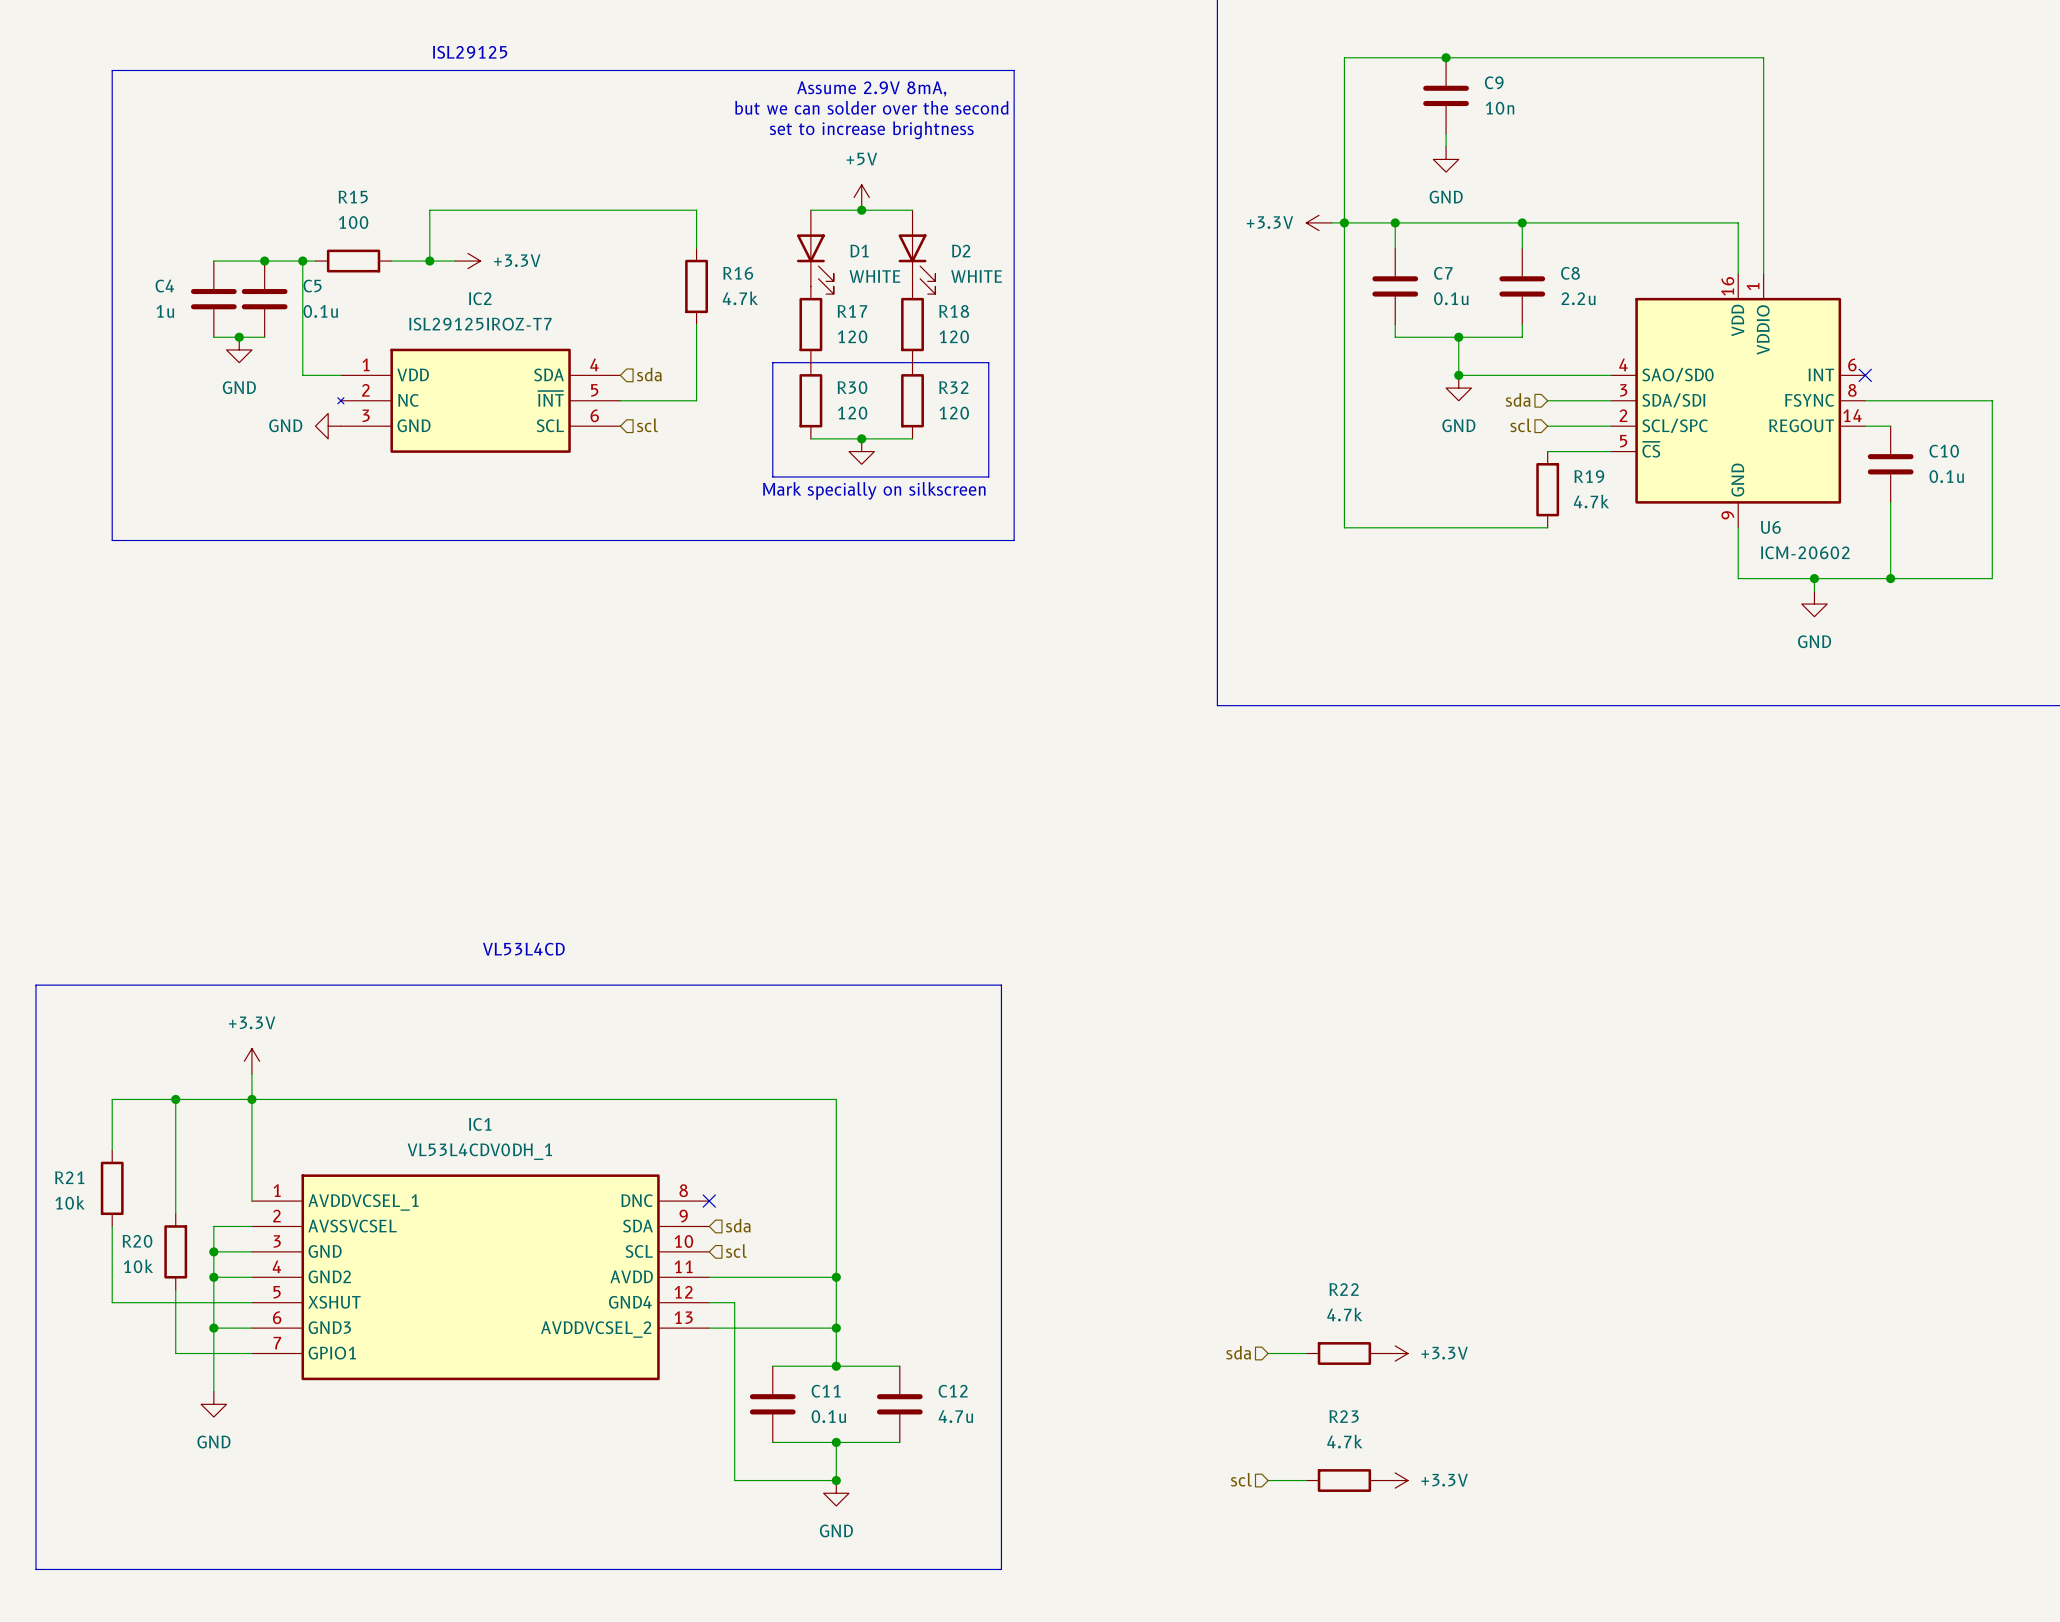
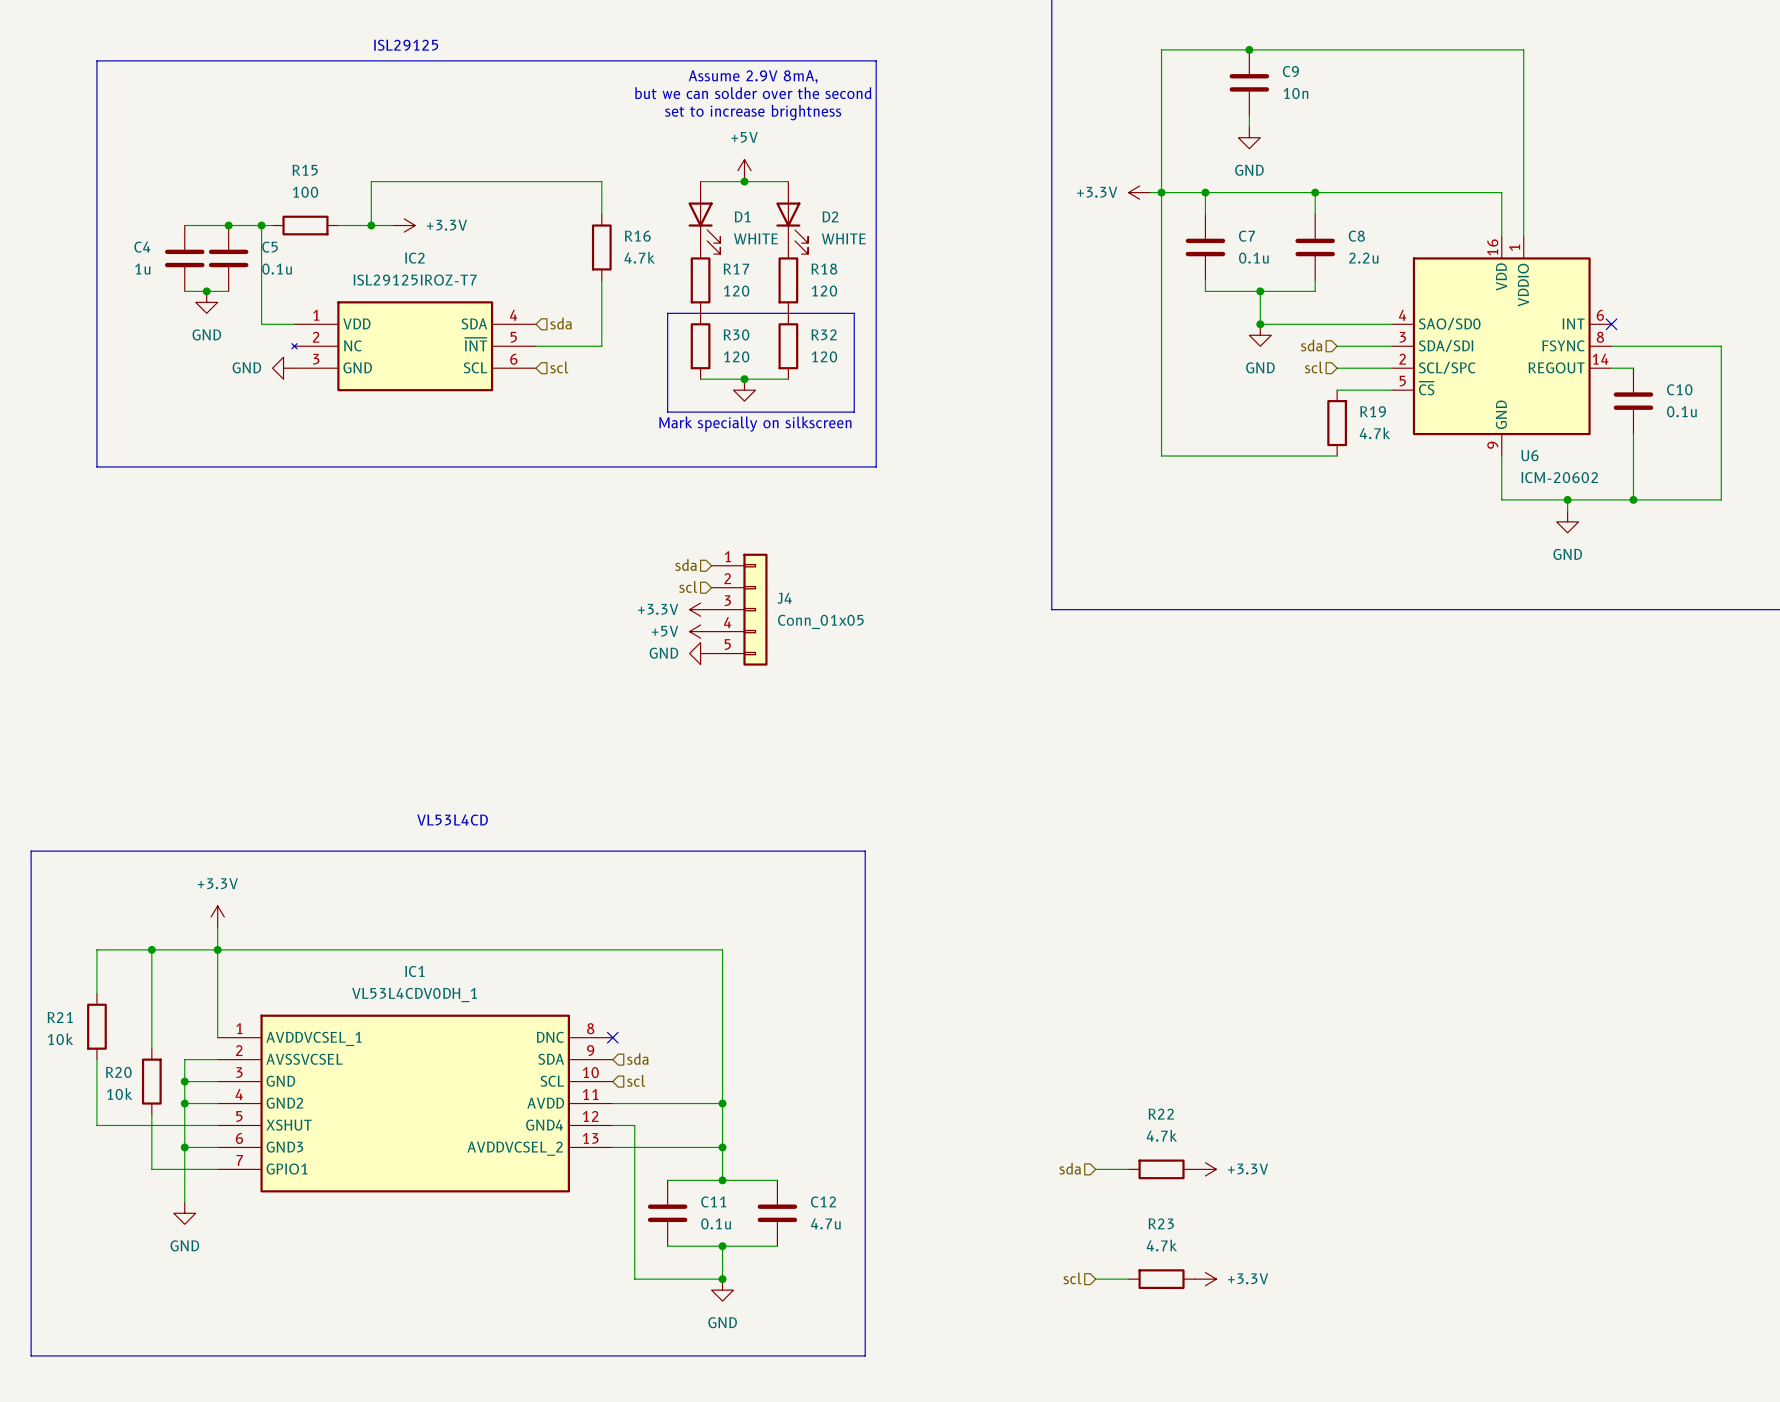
hierarchical label: none -> sda (686, 565)
hierarchical label: none -> scl (688, 586)
power symbol: none -> +3.3V (700, 609)
J4: none -> Conn_01x05 (739, 609)
power symbol: none -> +5V (700, 631)
power symbol: none -> GND (700, 653)

